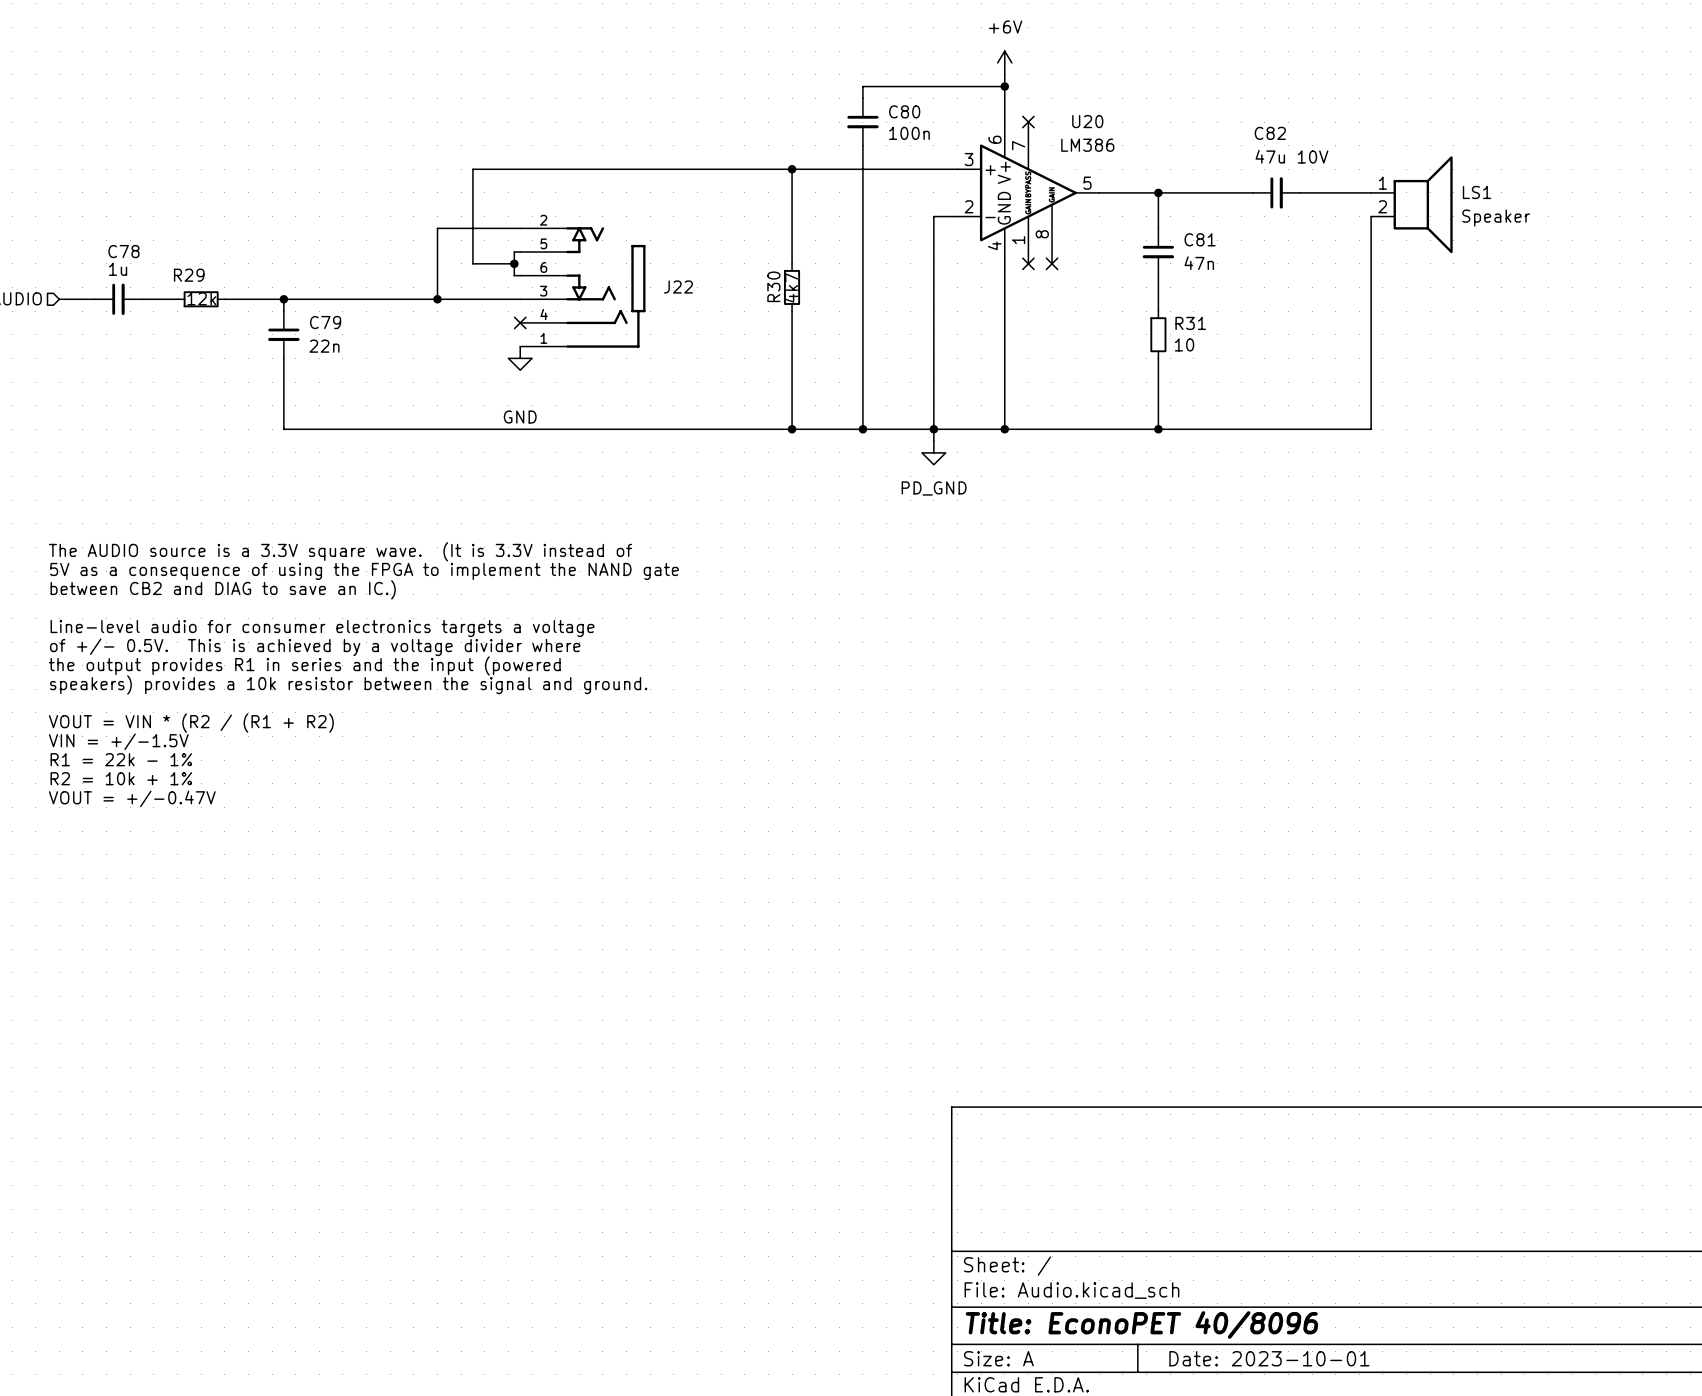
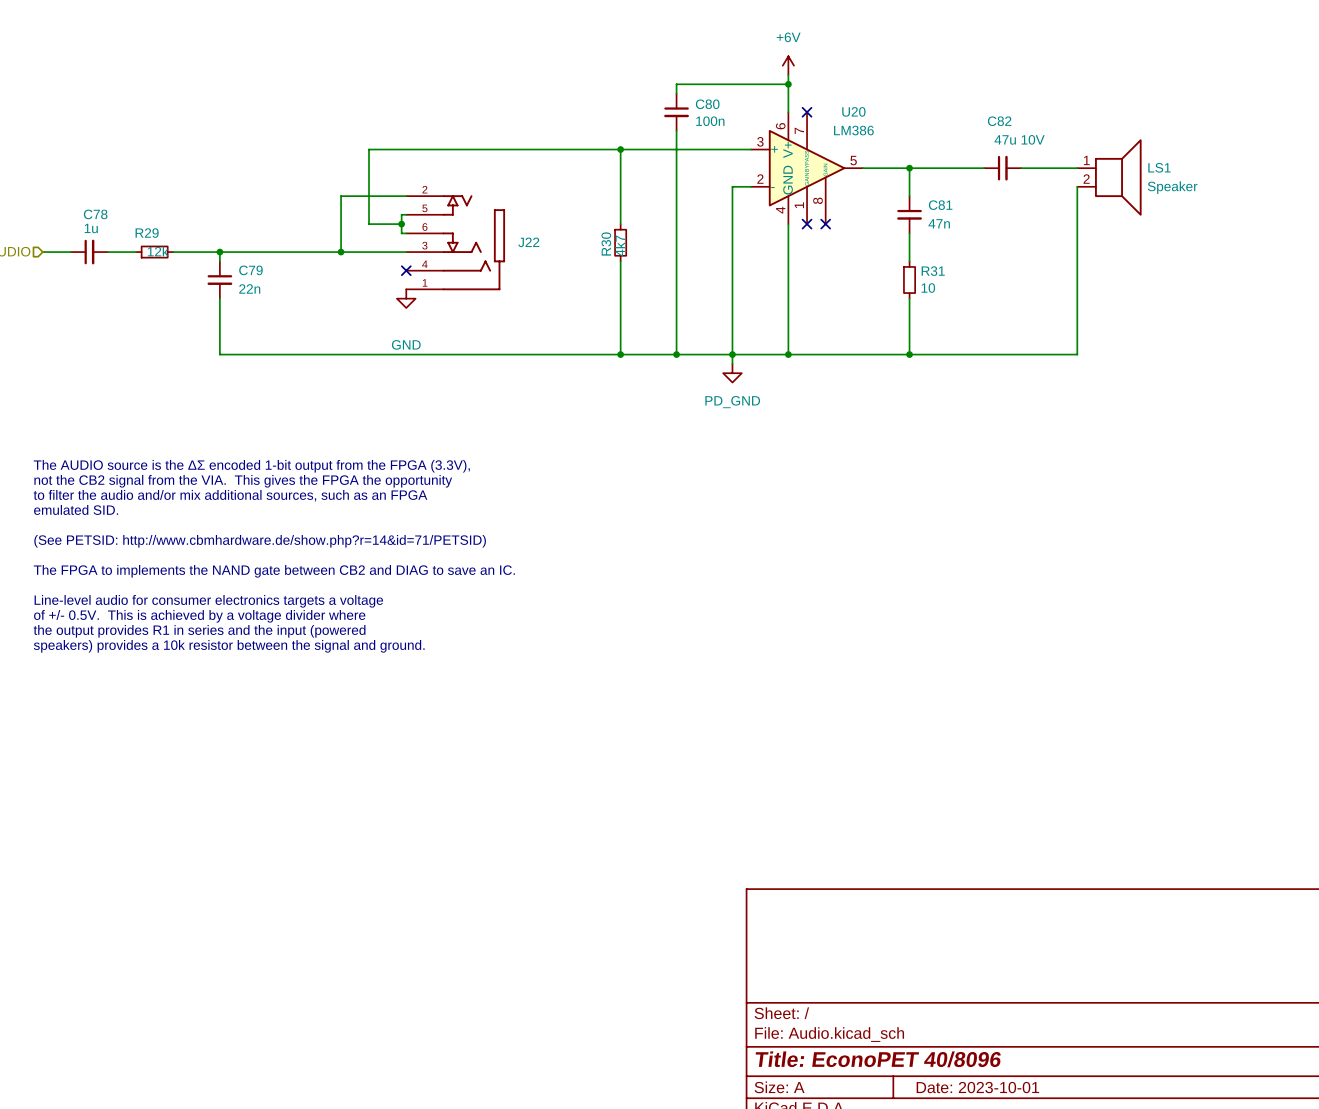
text: The AUDIO source is a 3.3V square wave. (It is 3.3V instead of (340, 551) -> none
text: 5V as a consequence of using the FPGA to implement the NAND gate (364, 571) -> The AUDIO source is the ΔΣ encoded 1-bit output from the FPGA (3.3V), (251, 466)
text: between CB2 and DIAG to save an IC.) (223, 589) -> not the CB2 signal from the VIA. This gives the FPGA the opportunity (243, 481)
text: none -> to filter the audio and/or mix additional sources, such as an FPGA (230, 495)
text: Line-level audio for consumer electronics targets a voltage (322, 628) -> emulated SID. (76, 509)
text: of +/- 0.5V. This is achieved by a voltage divider where (315, 647) -> none
text: the output provides R1 in series and the input (powered (304, 665) -> (See PETSID: http://www.cbmhardware.de/show.php?r=14&id=71/PETSID) (260, 541)
text: speakers) provides a 10k resistor between the signal and ground. (348, 685) -> none
text: none -> The FPGA to implements the NAND gate between CB2 and DIAG to save an IC. (274, 571)
text: VOUT = VIN * (R2 / (R1 + R2) (191, 723) -> none
text: VIN = +/-1.5V (118, 741) -> Line-level audio for consumer electronics targets a voltage (208, 601)
text: R1 = 22k - 1% (121, 759) -> of +/- 0.5V. This is achieved by a voltage divider where (199, 616)
text: R2 = 10k + 1% (121, 778) -> the output provides R1 in series and the input (powered (199, 631)
text: VOUT = +/-0.47V (132, 798) -> speakers) provides a 10k resistor between the signal and ground. (229, 646)

